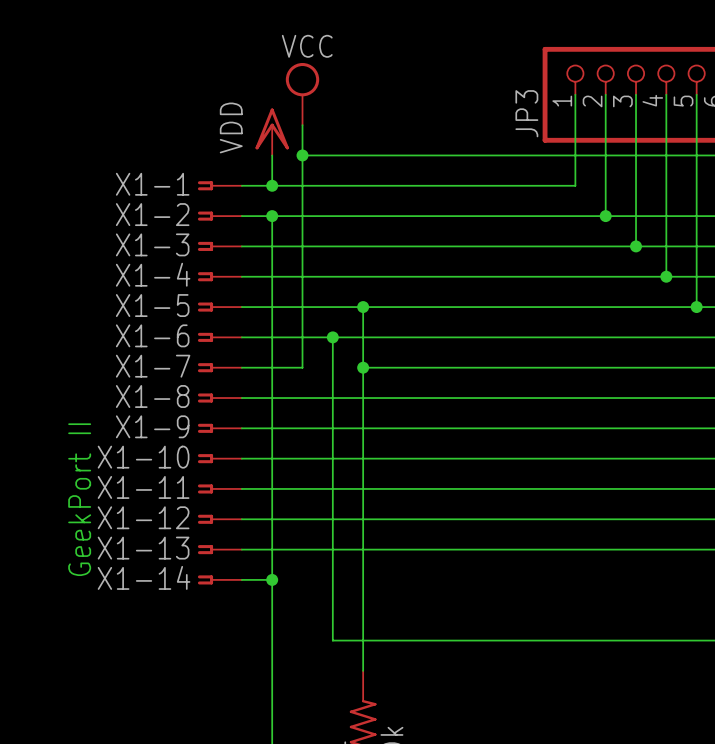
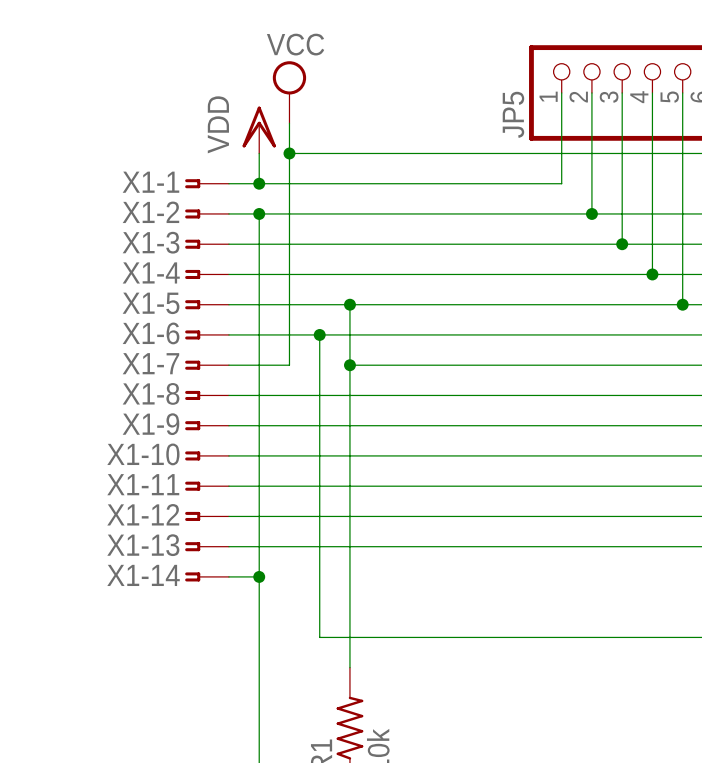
JP3 name: JP3 (526, 113) -> JP5 (513, 114)
text: GeekPort II (79, 499) -> none

